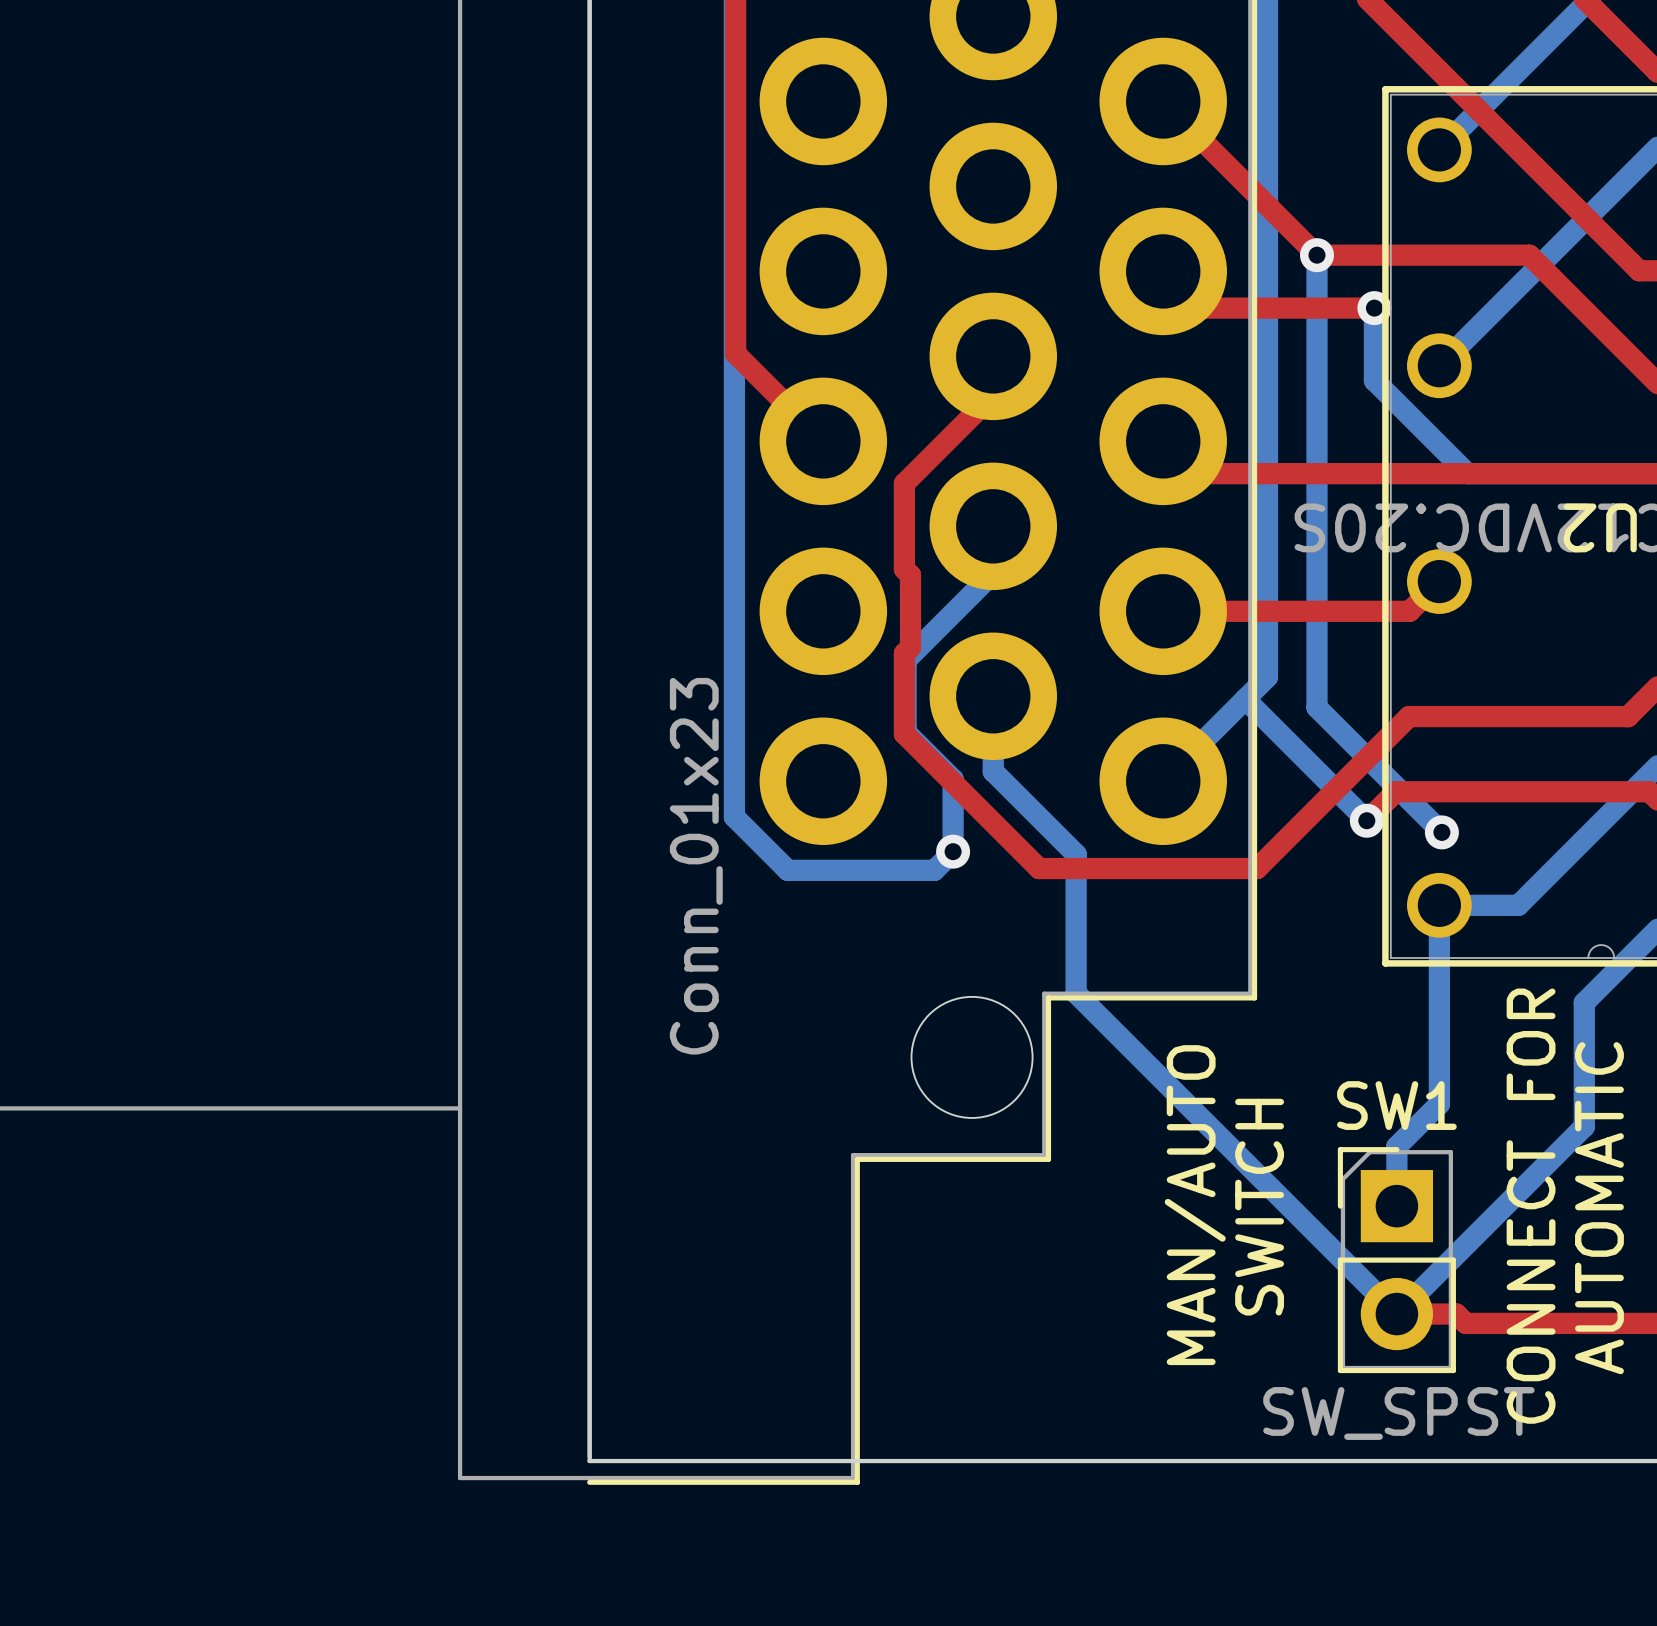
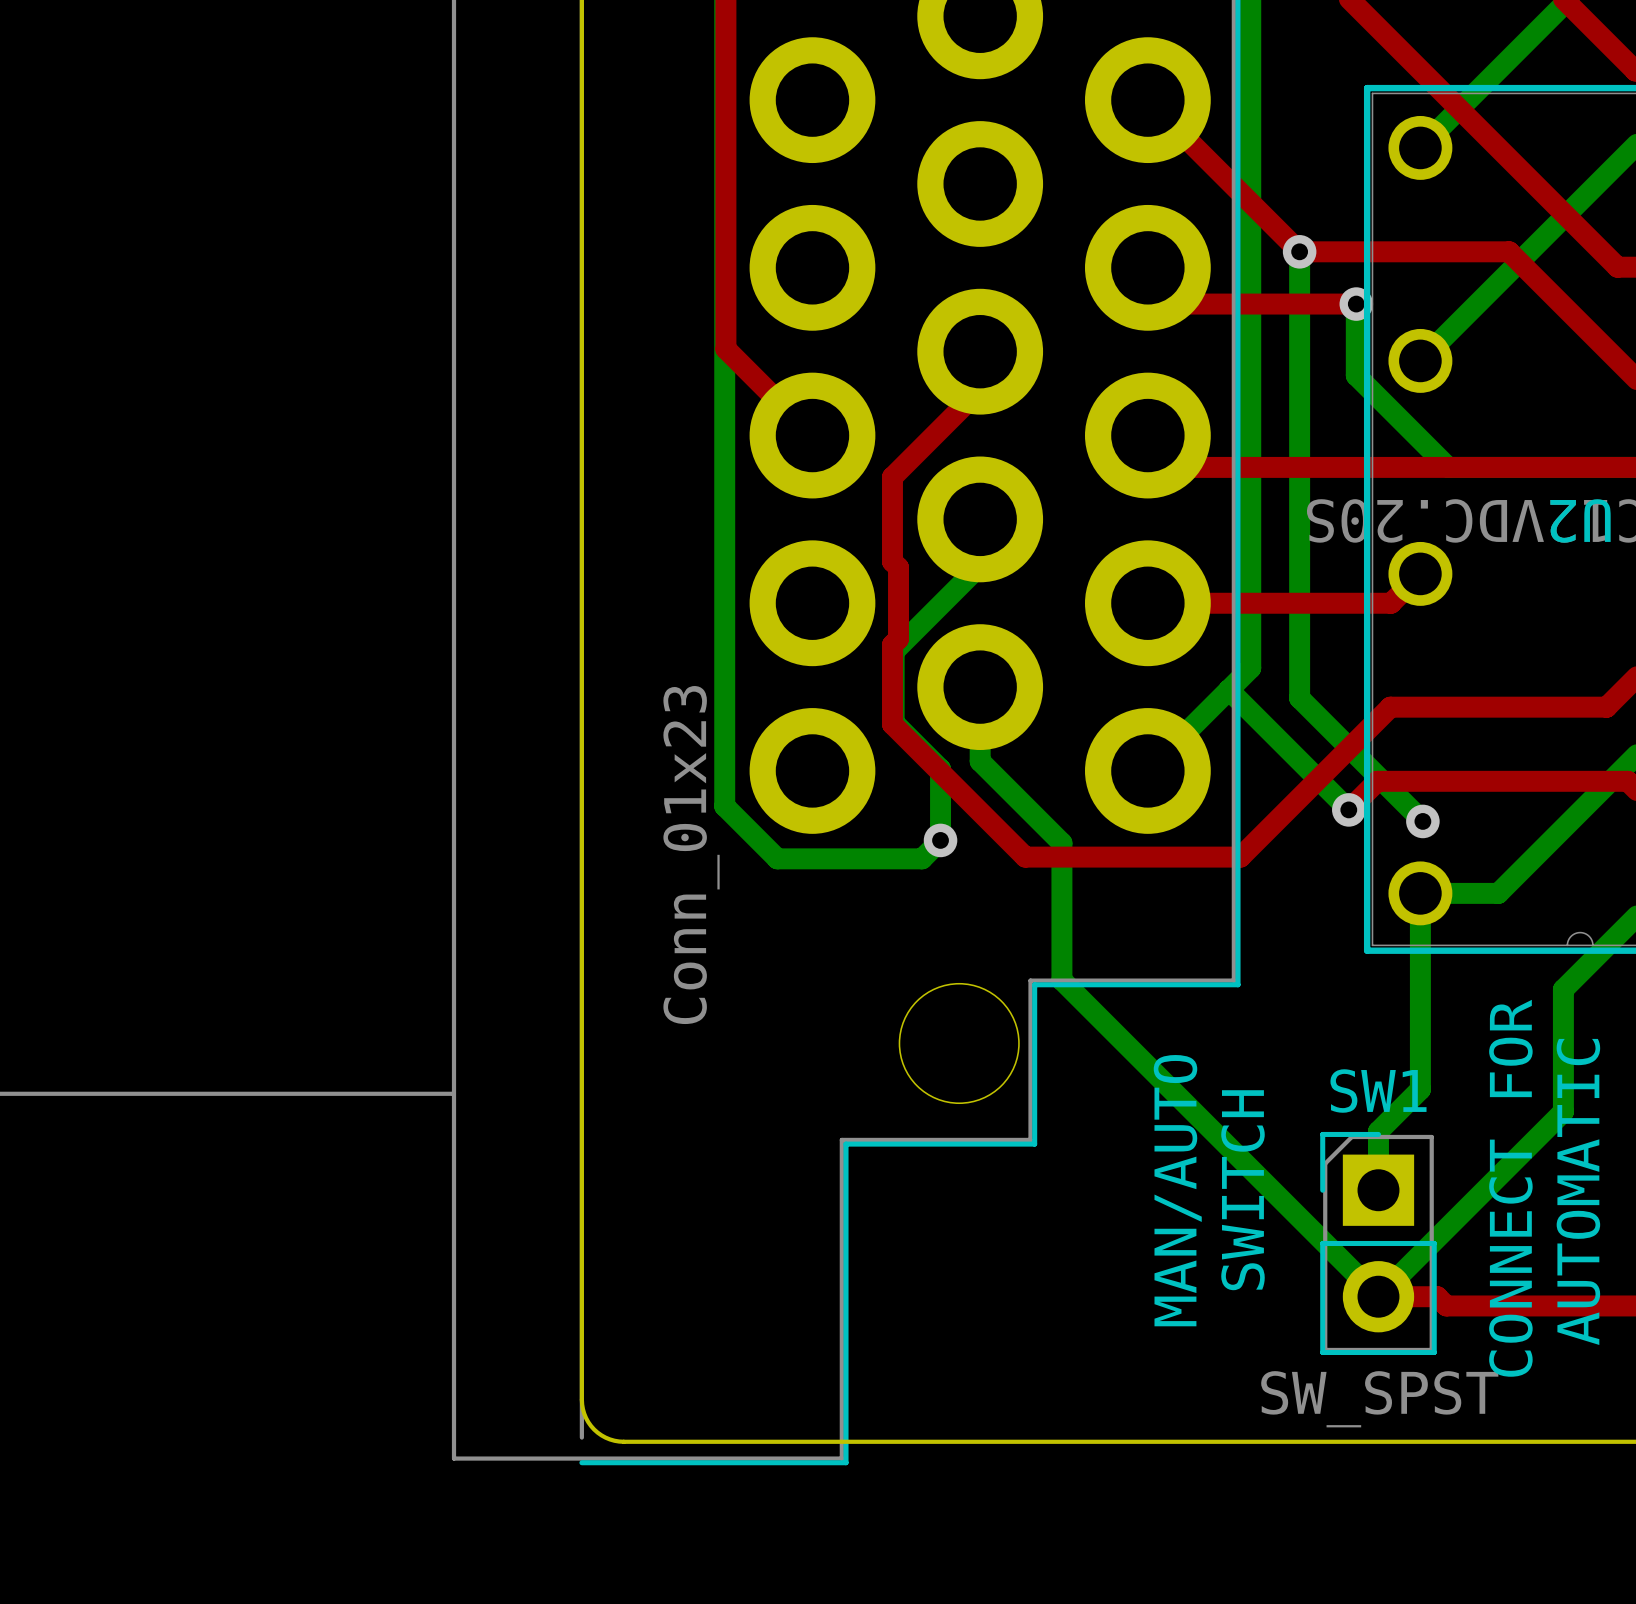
board edge: (589, 1418) (589, 1461) (632, 1461) -> (581, 1399) (584, 1413) (594, 1429) (605, 1437) (623, 1441)

